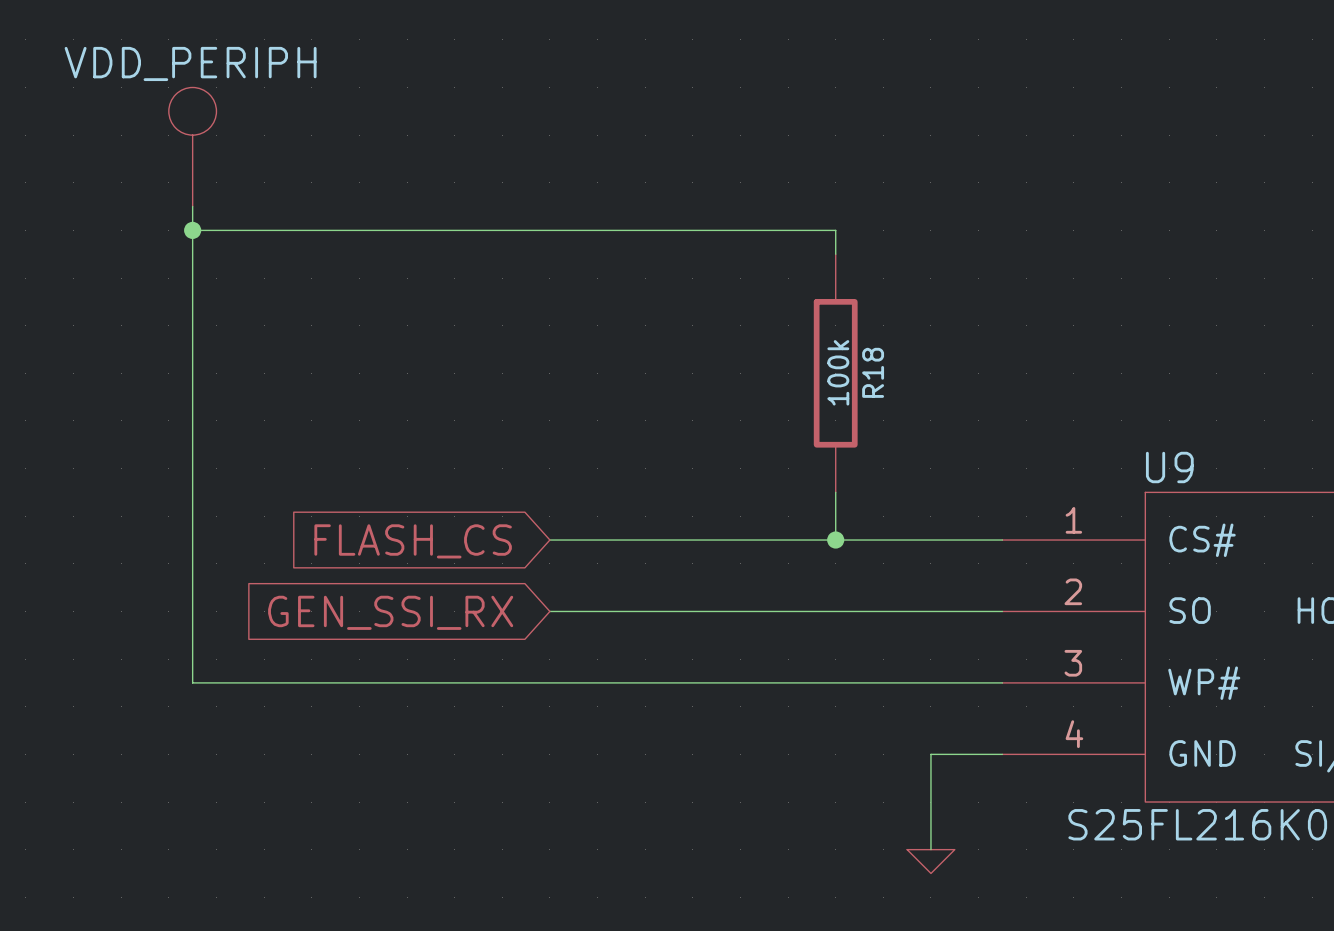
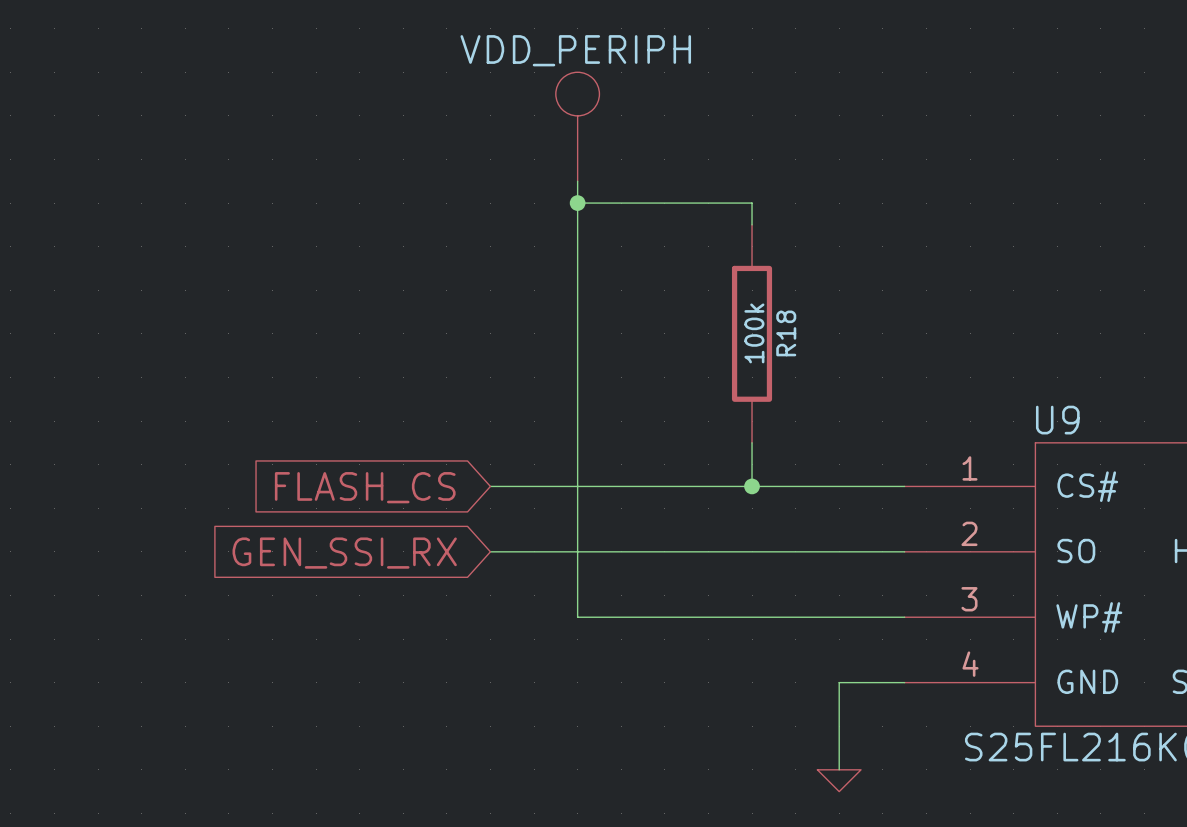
power symbol position: VDD_PERIPH (192, 147) -> VDD_PERIPH (577, 126)
wire: (192, 206) (192, 682) (645, 682) -> (577, 181) (577, 617)
wire: (192, 230) (645, 230) -> none
junction: (192, 230) -> none
junction: none -> (577, 203)

